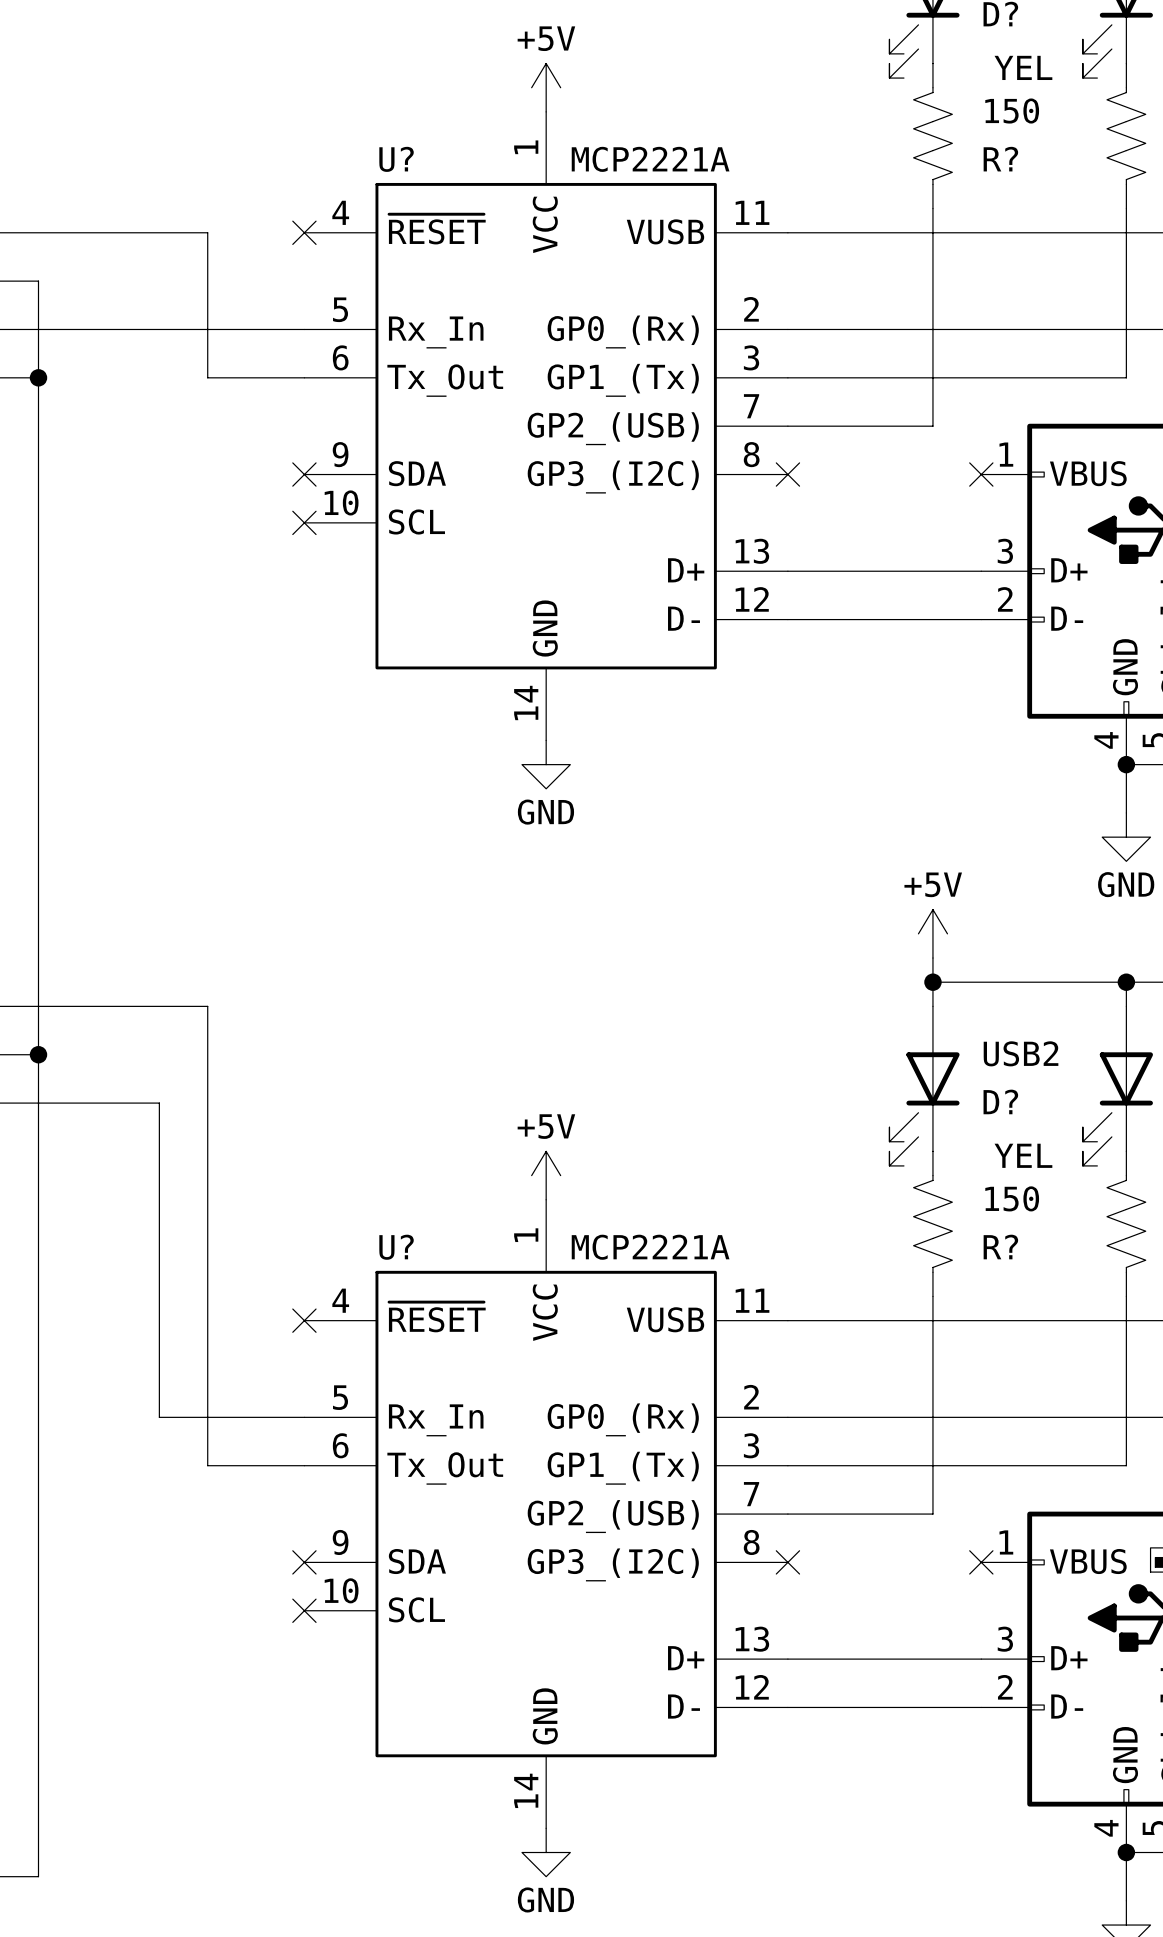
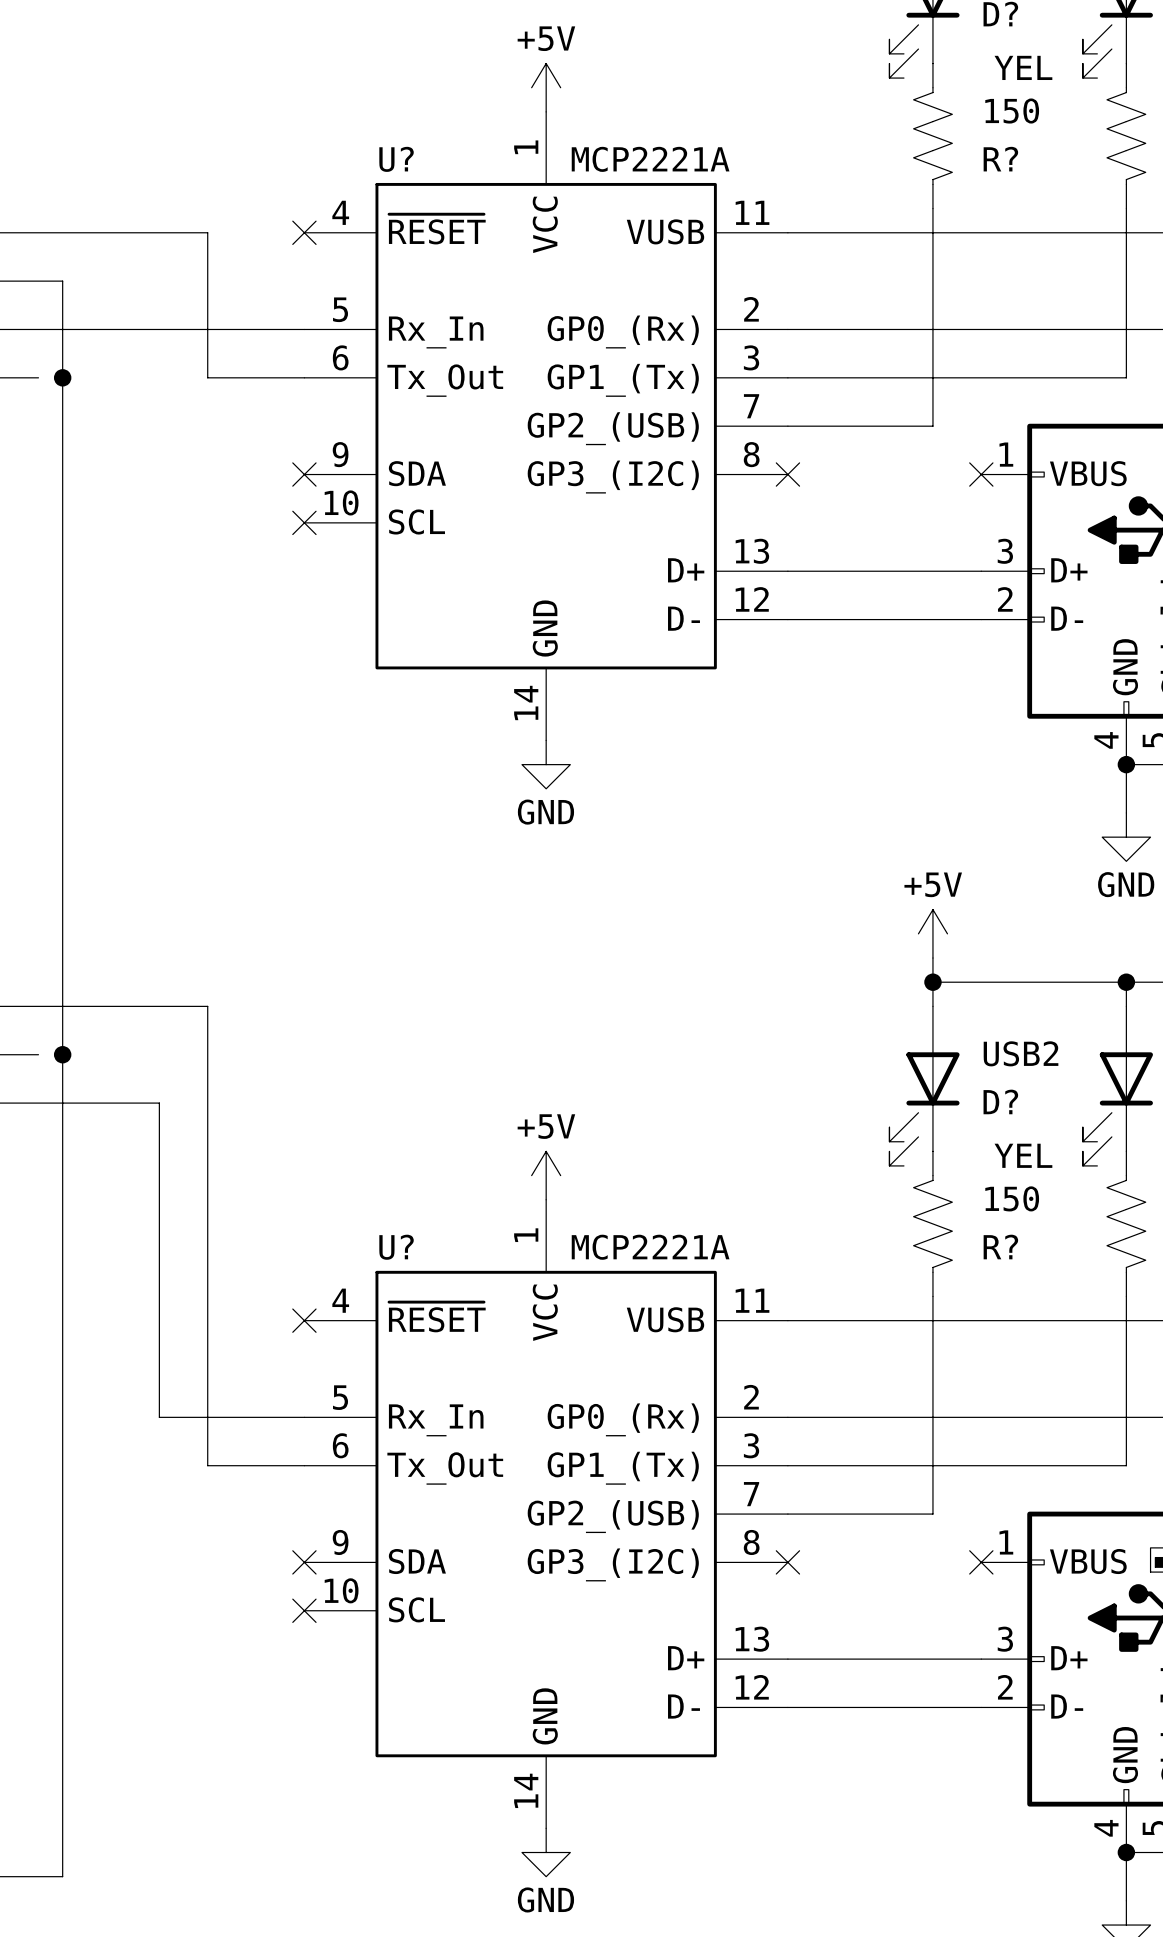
wire: (38, 281) (38, 1876) -> (38, 281) (62, 281) (62, 1876) (38, 1876)
junction position: (38, 377) -> (62, 377)
junction position: (38, 1054) -> (62, 1054)

